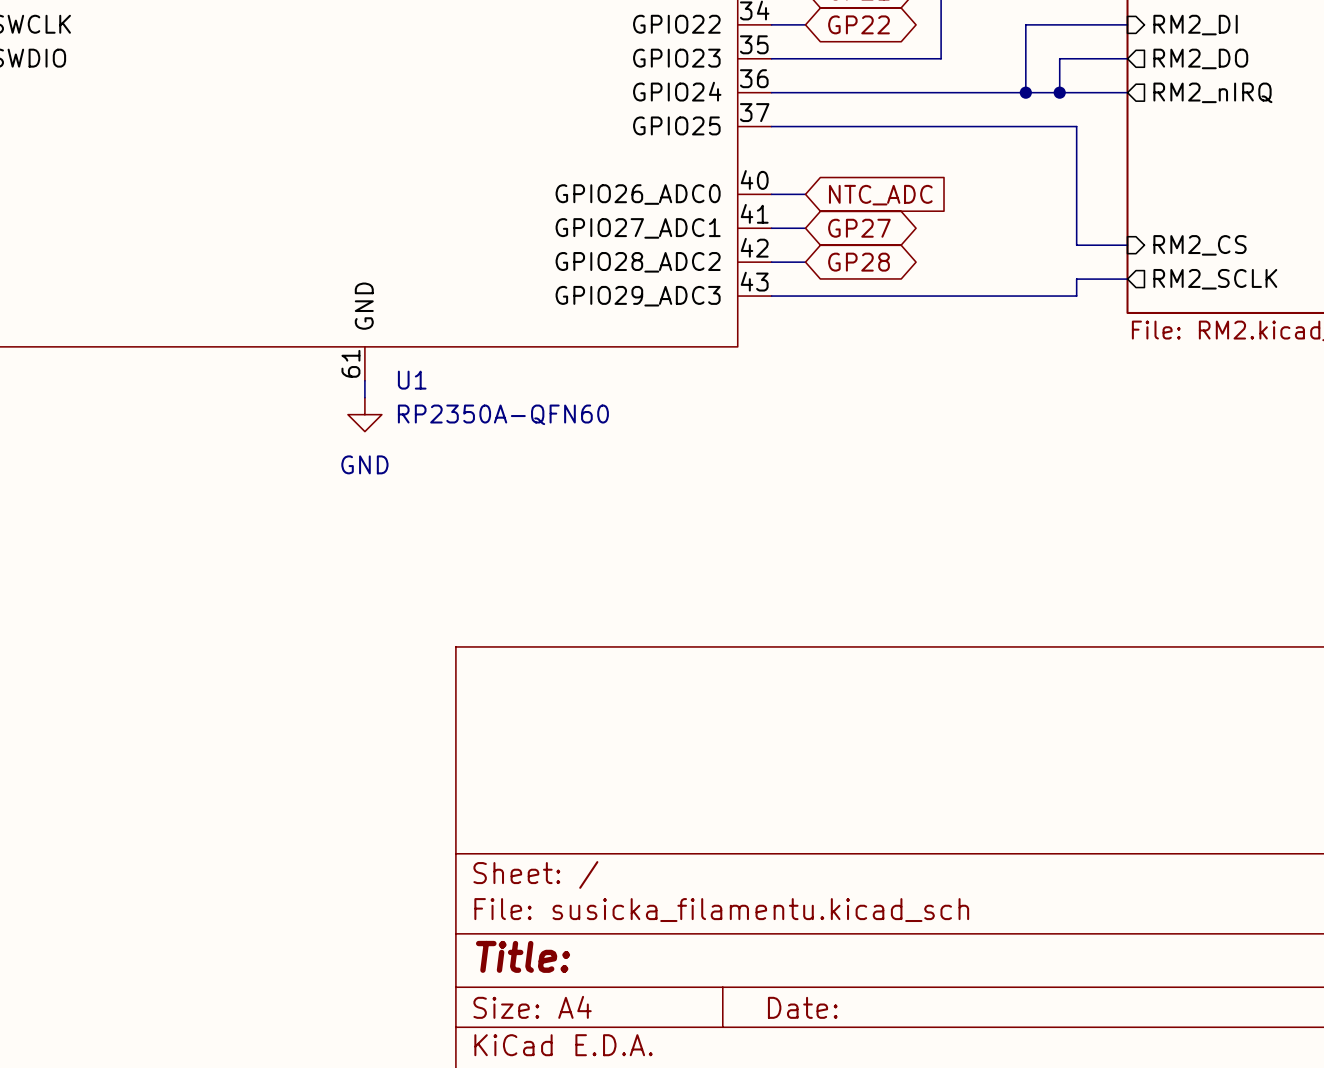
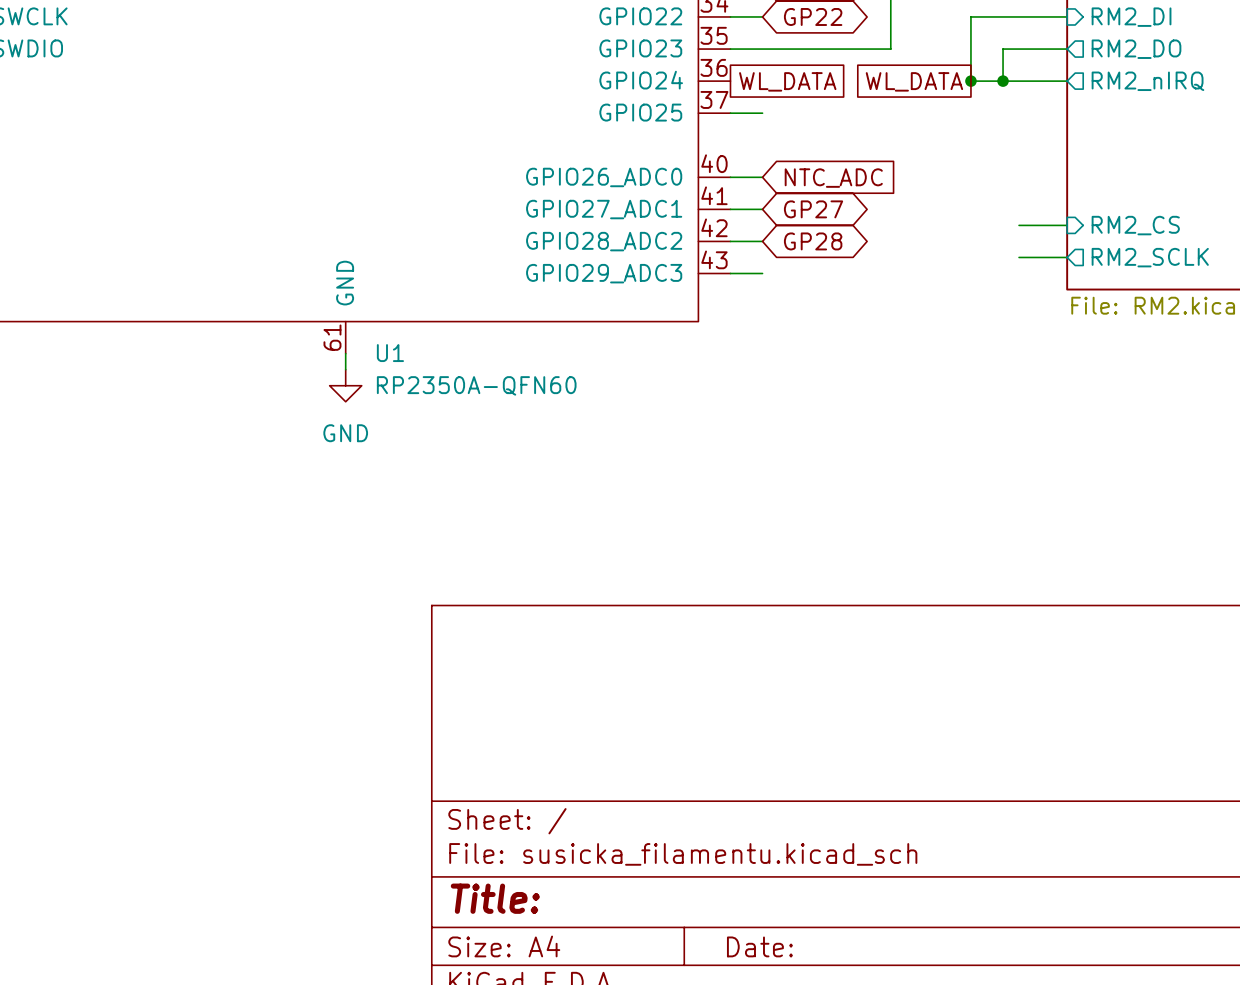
wire: (771, 92) (1025, 92) -> none
global label: none -> WL_DATA (787, 81)
global label: none -> WL_DATA (914, 81)
wire: (805, 126) (1076, 126) (1076, 245) -> none
wire: (1076, 279) (1076, 296) (805, 296) -> none

